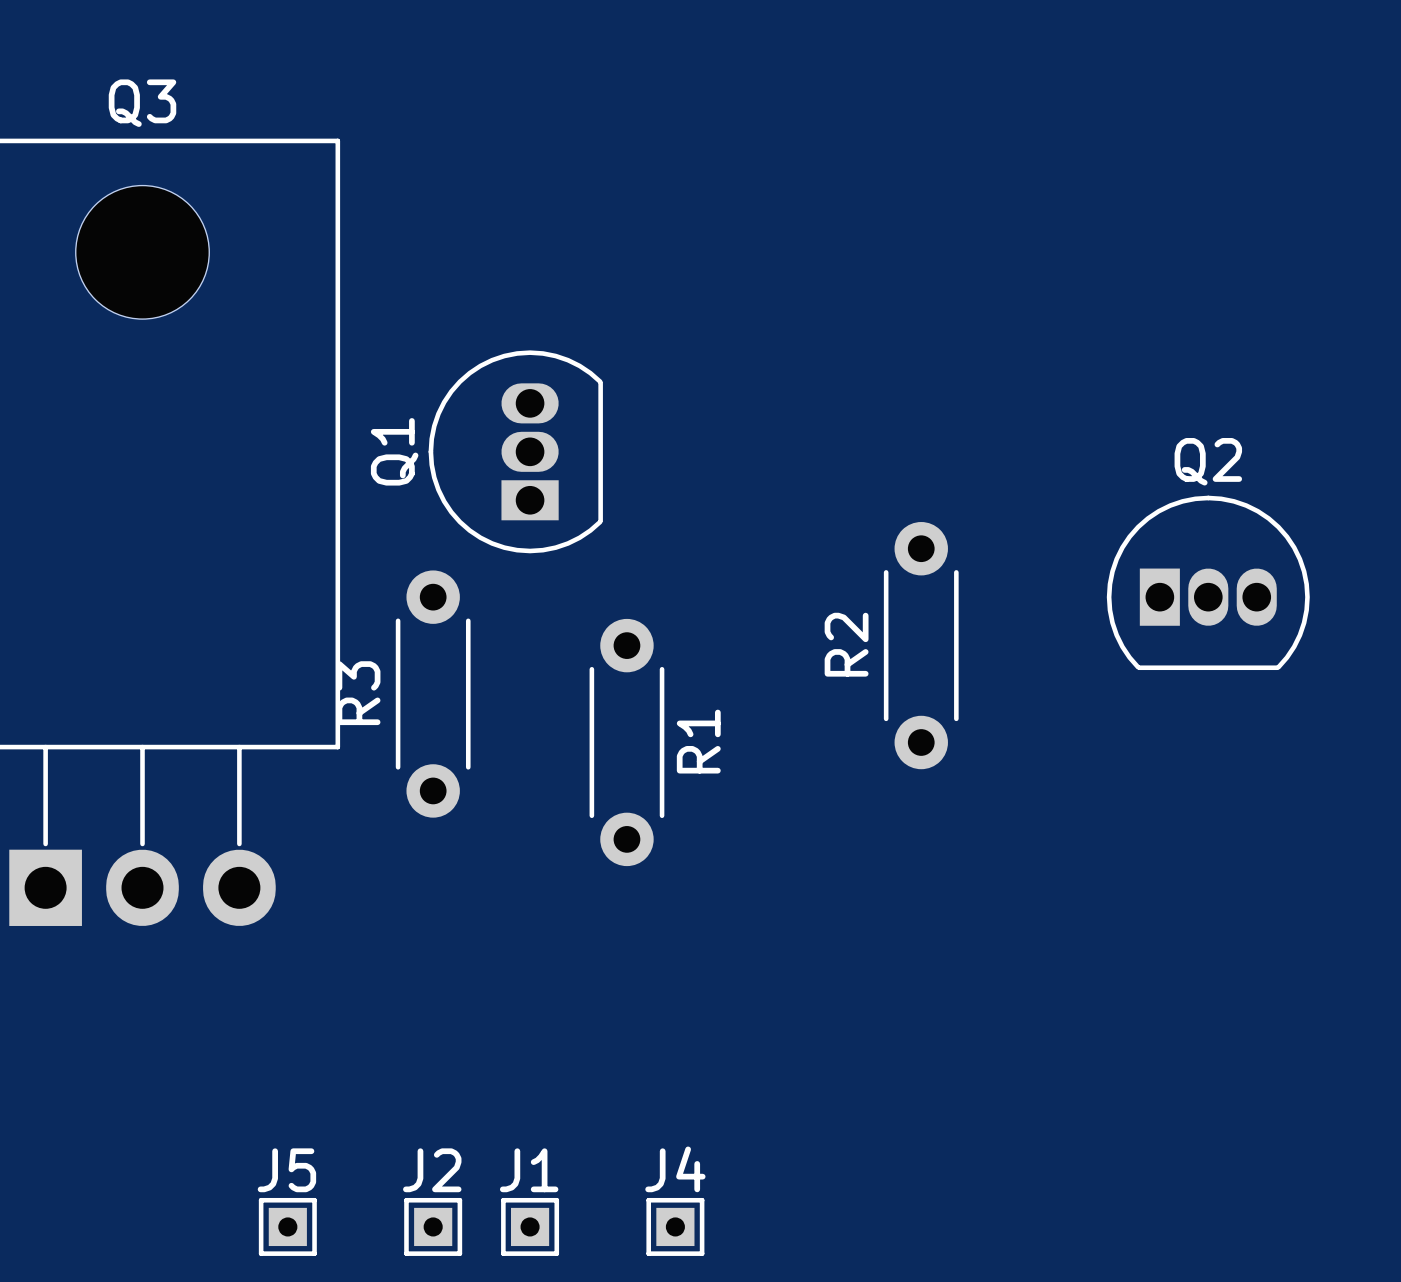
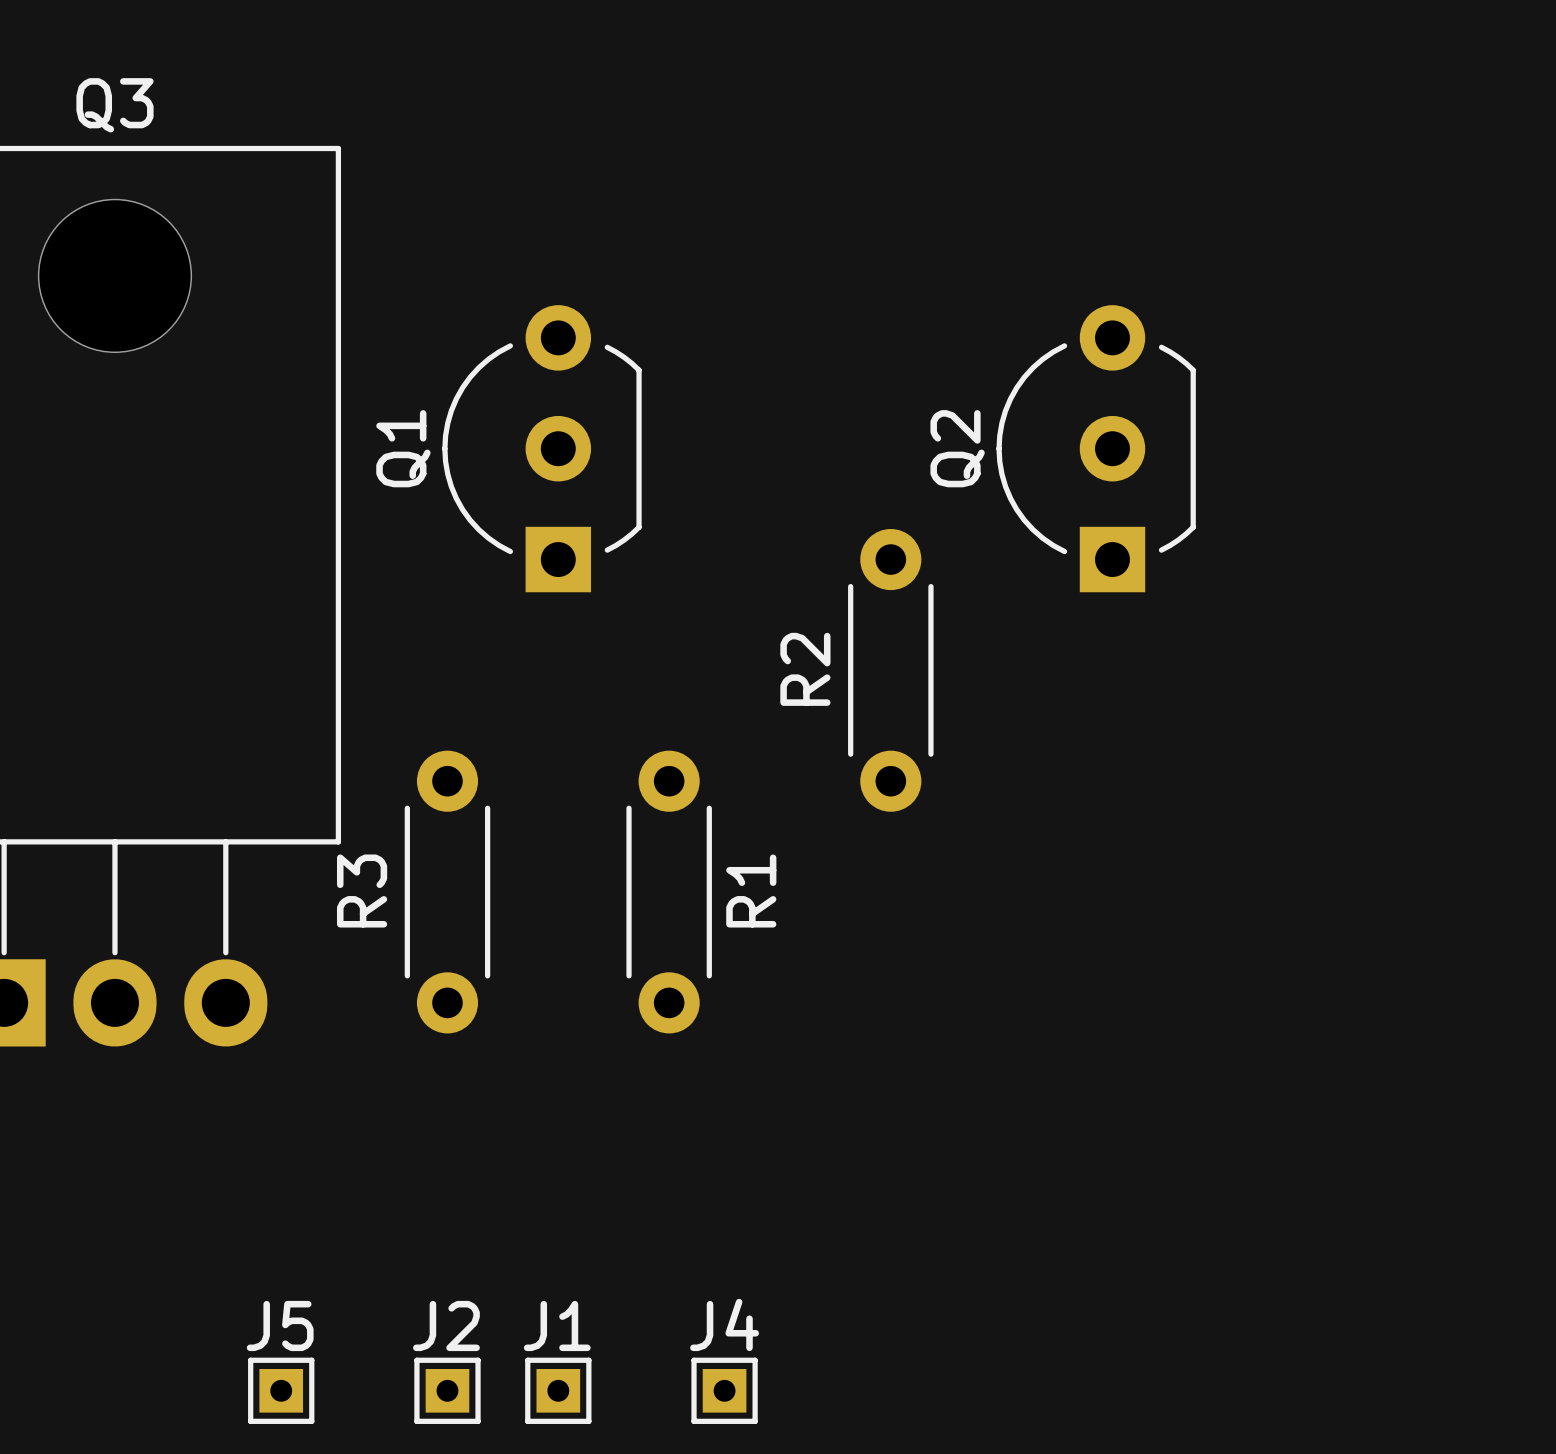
Q1 footprint: [428, 350, 603, 554] -> [442, 305, 642, 593]
Q2 name position: Q2 (1208, 461) -> Q2 (957, 448)
Q2 footprint: [1106, 495, 1310, 671] -> [996, 305, 1196, 593]
R2 position: (921, 645) -> (890, 670)
R3 position: (433, 694) -> (447, 892)
R1 position: (626, 742) -> (669, 892)

